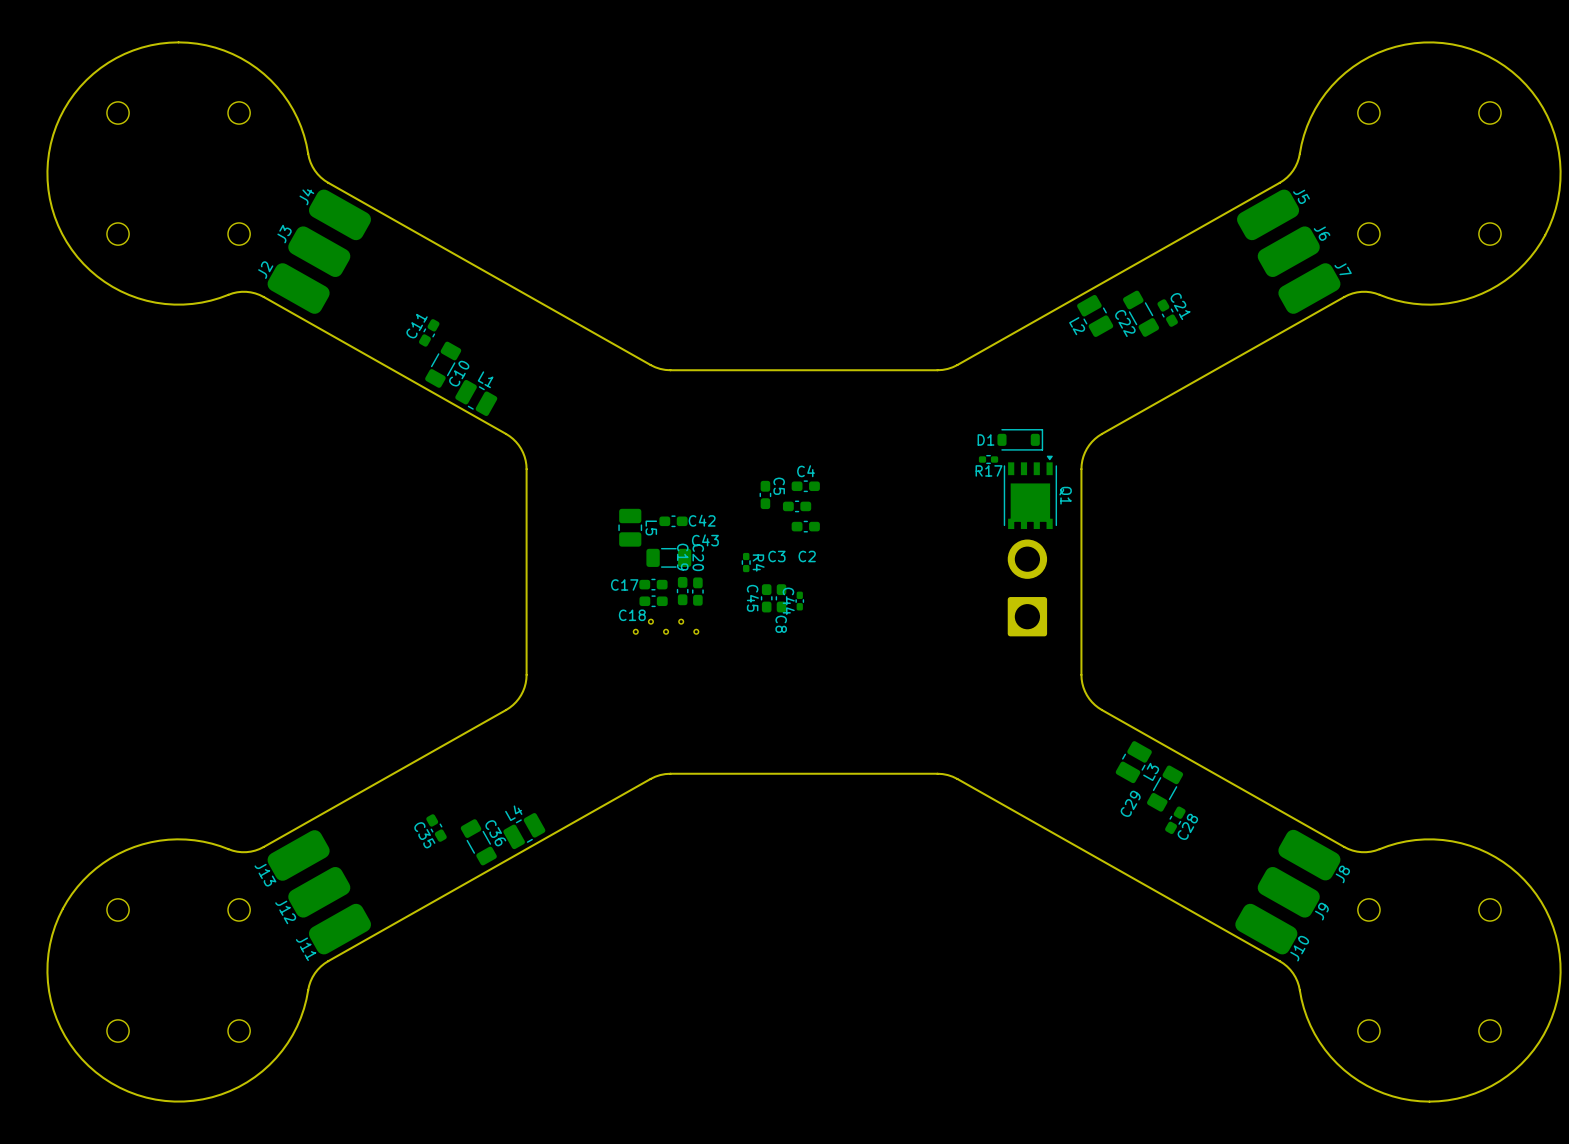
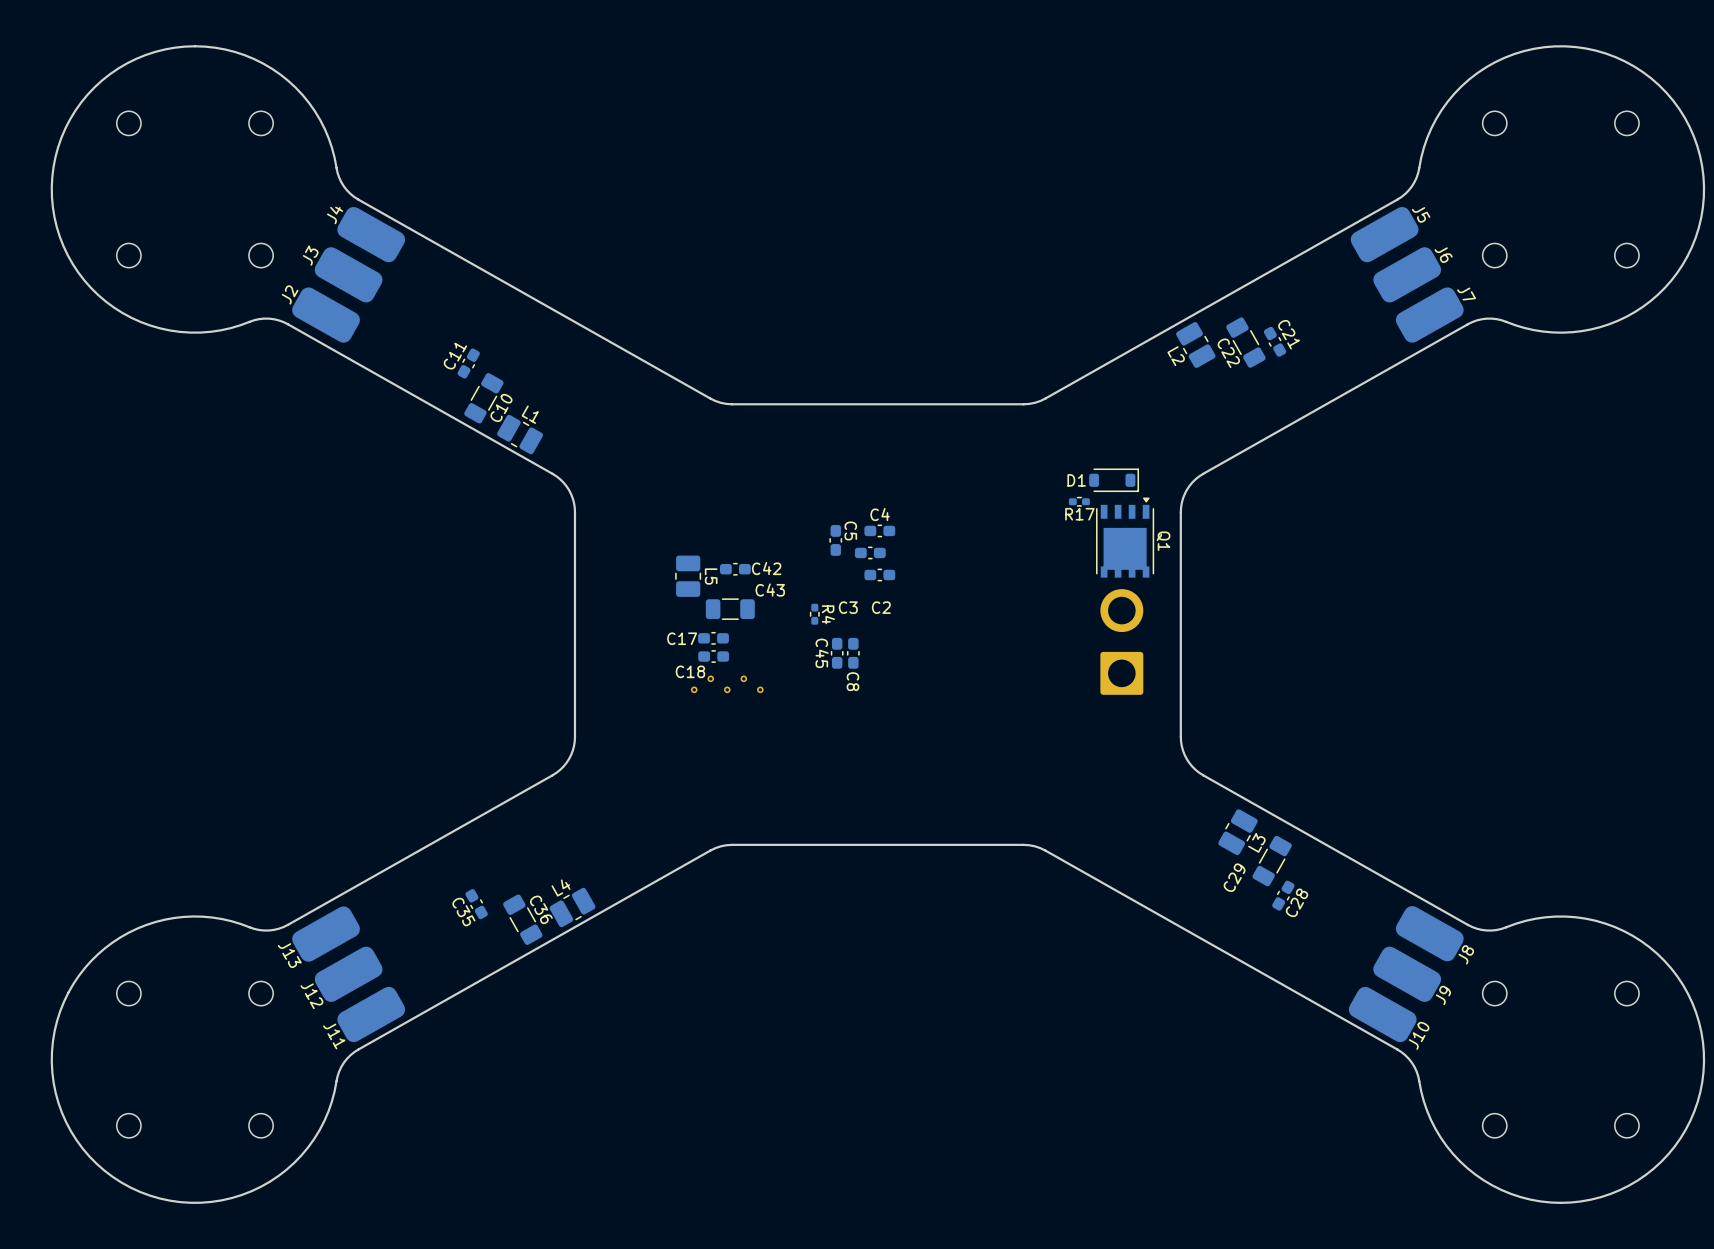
C19: (682, 591) -> none
C20: (697, 591) -> none
C44: (799, 601) -> none

